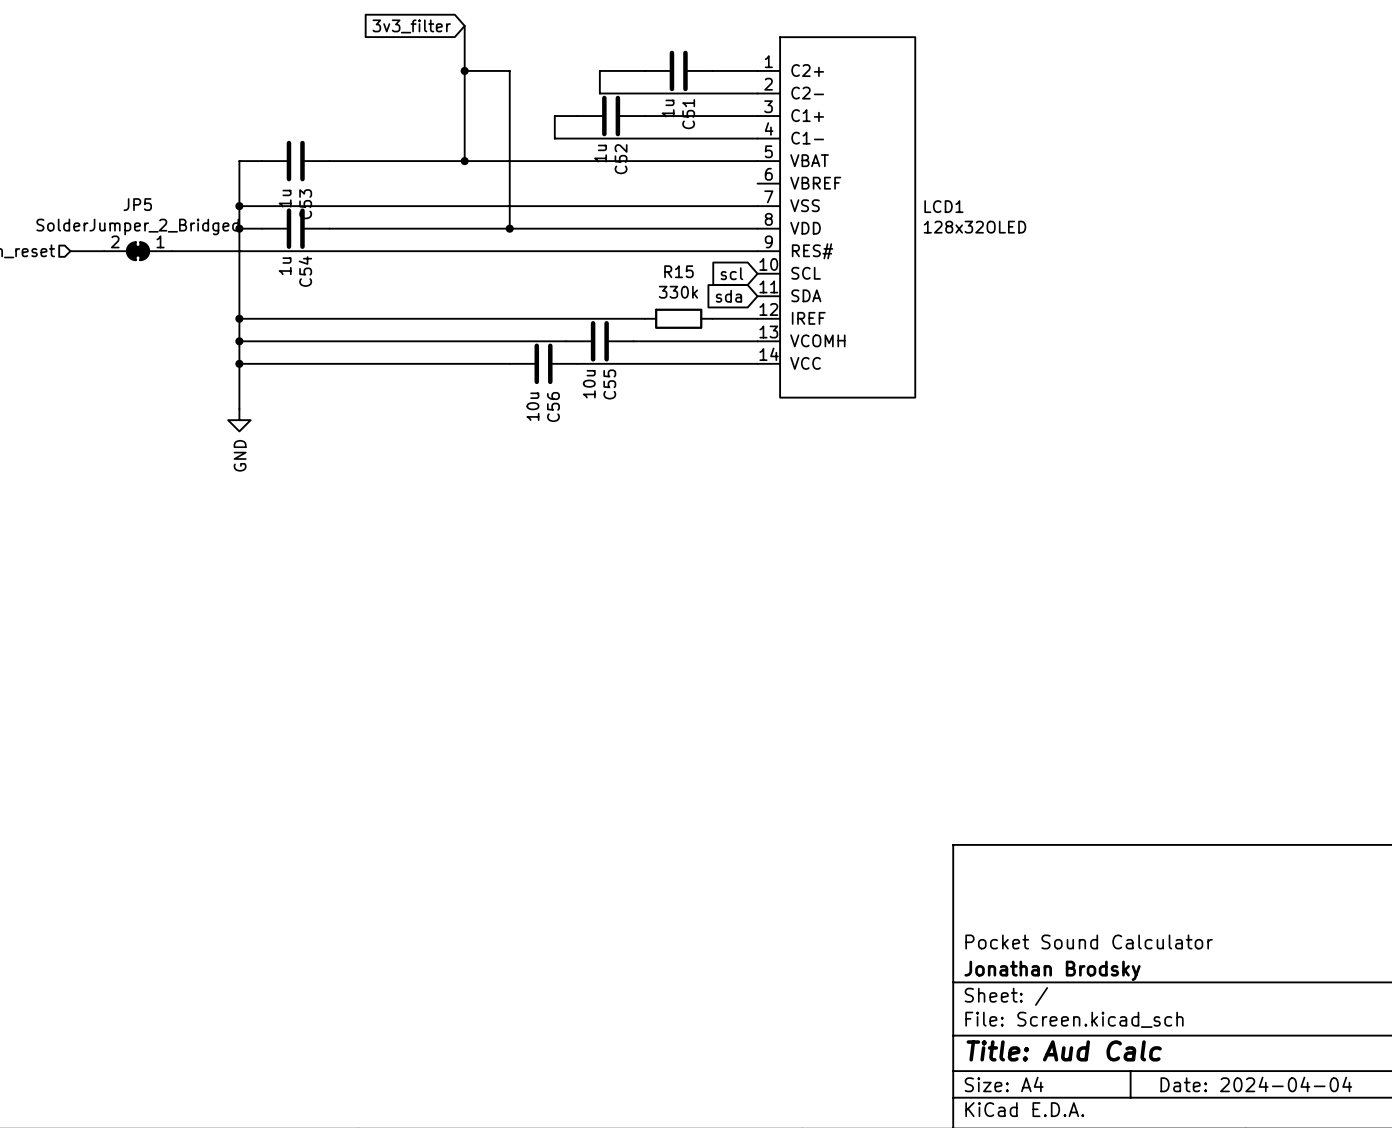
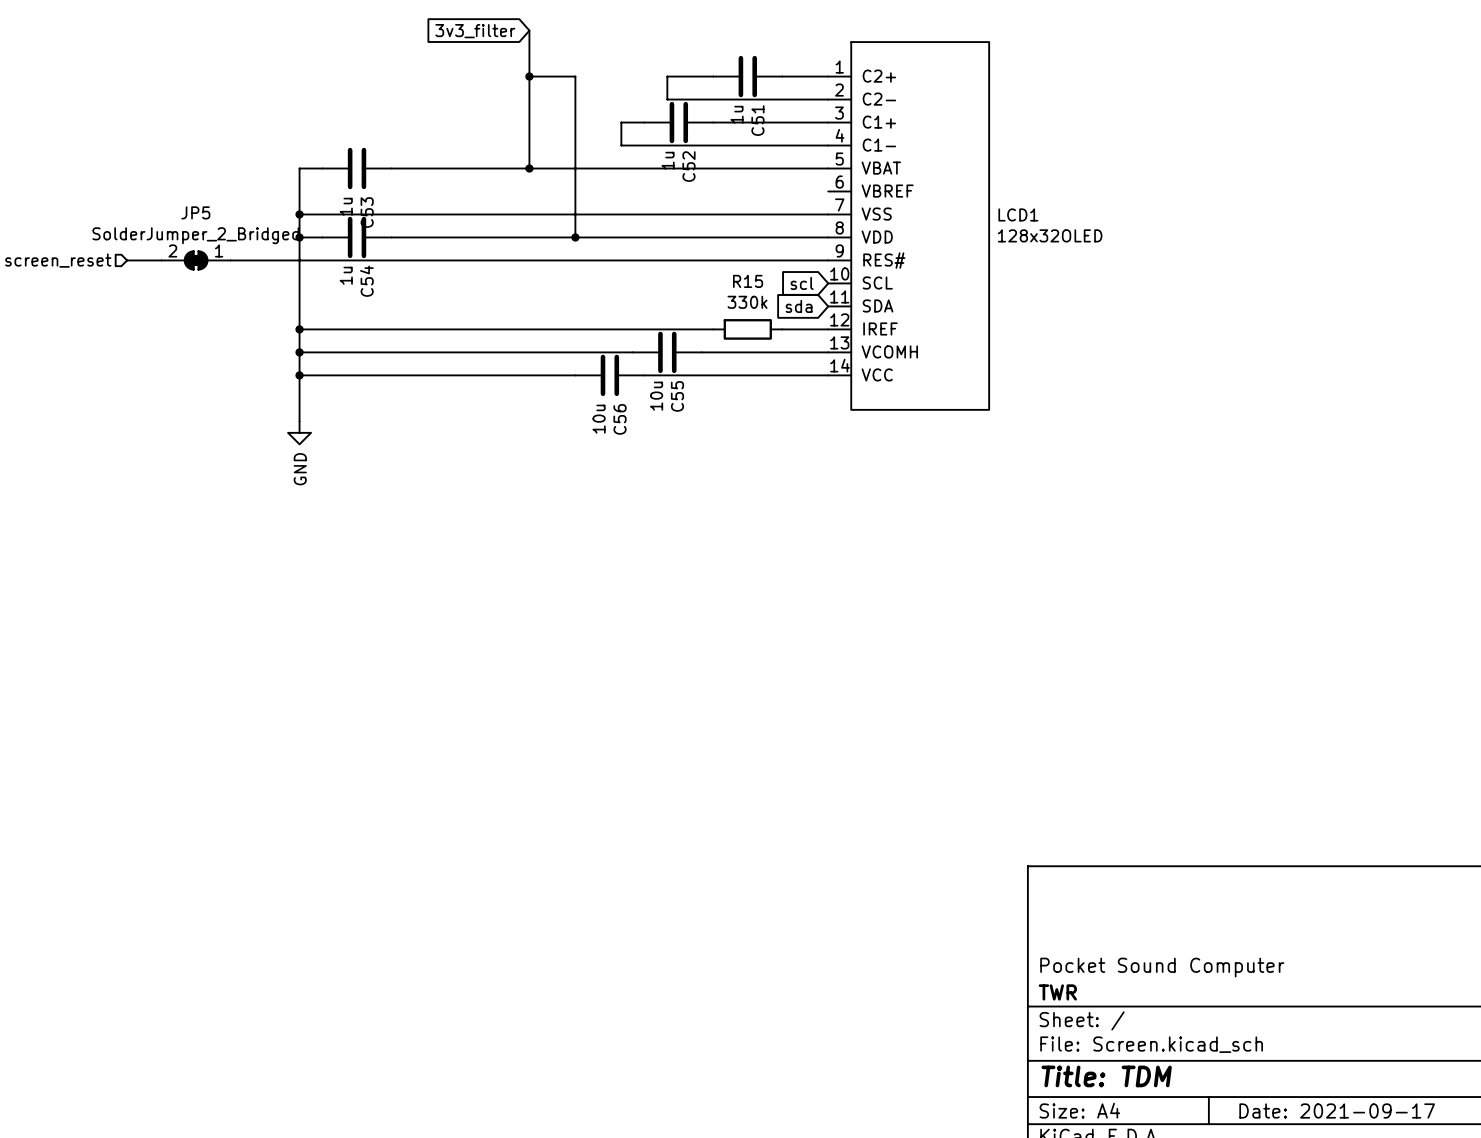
title block: Pocket Sound Calculator (1089, 941) -> Pocket Sound Computer (1162, 967)
title block: Jonathan Brodsky (1052, 970) -> TWR (1057, 992)
title block: Title: Aud Calc (1064, 1050) -> Title: TDM (1106, 1076)
title block: Date: 2024-04-04 (1256, 1084) -> Date: 2021-09-17 (1337, 1110)

